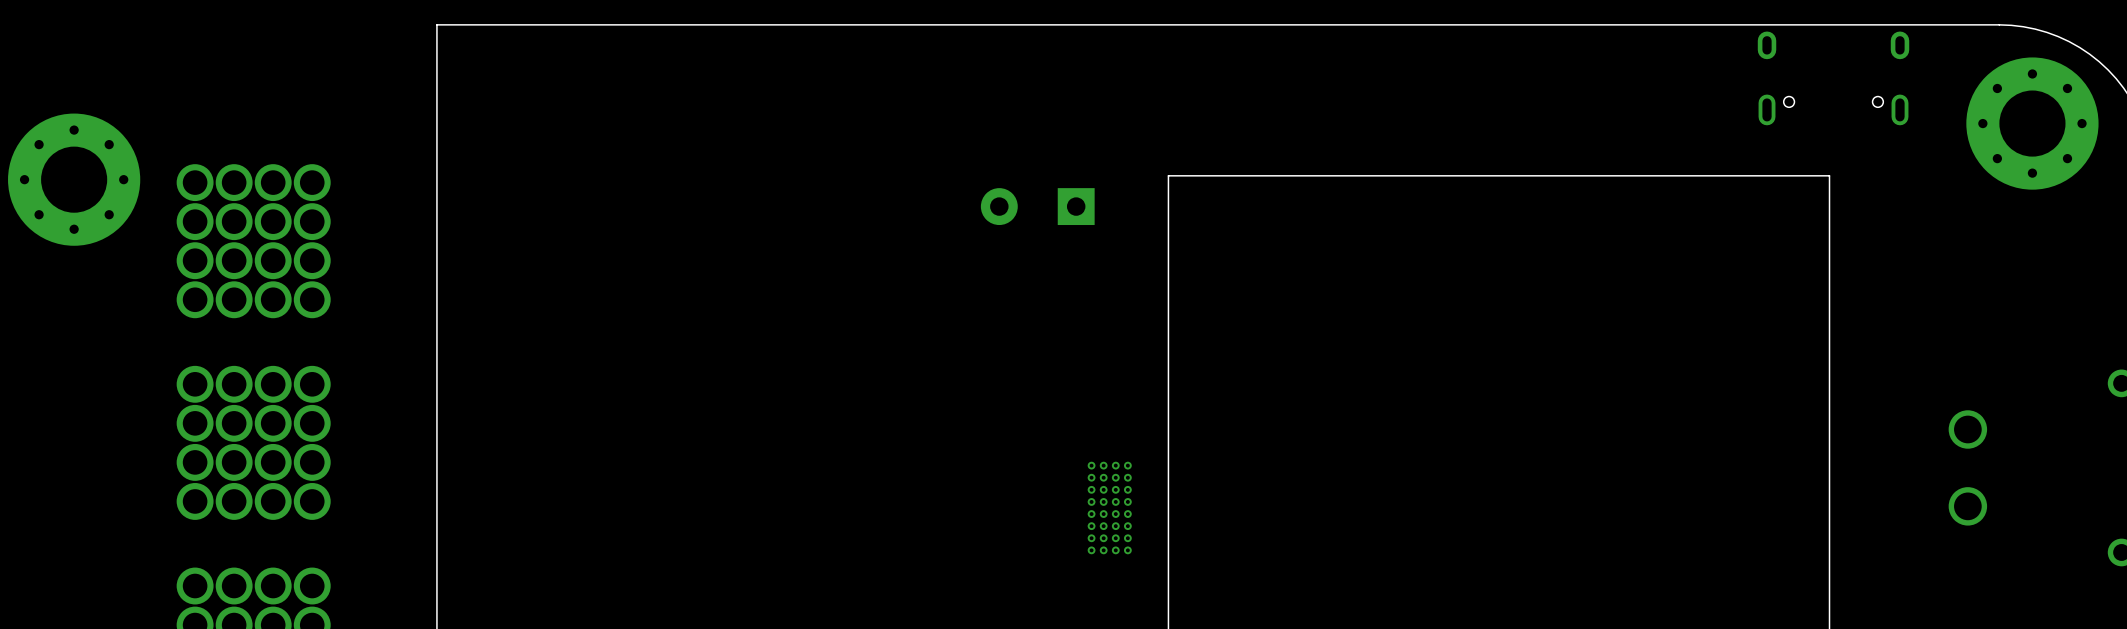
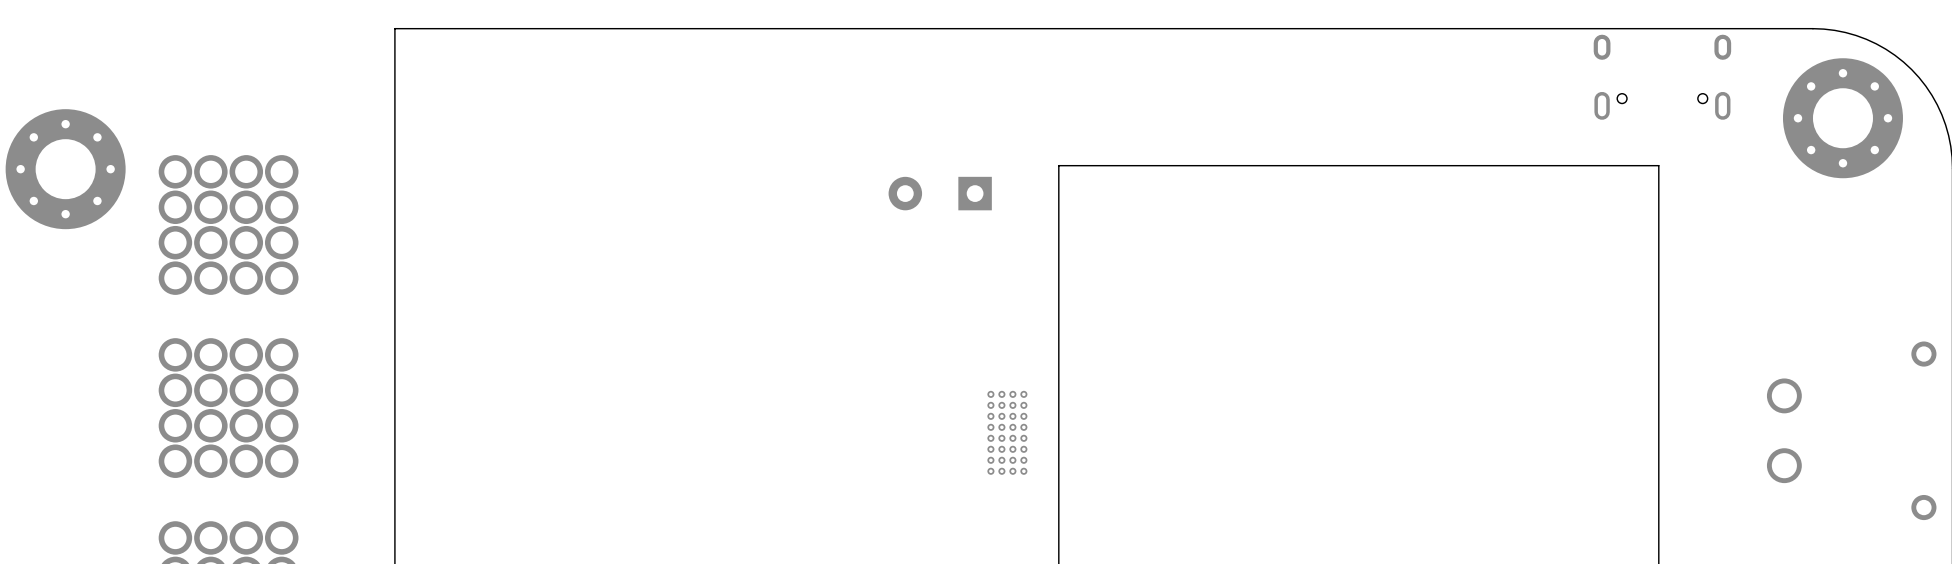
part position: (1109, 507) -> (1007, 432)

